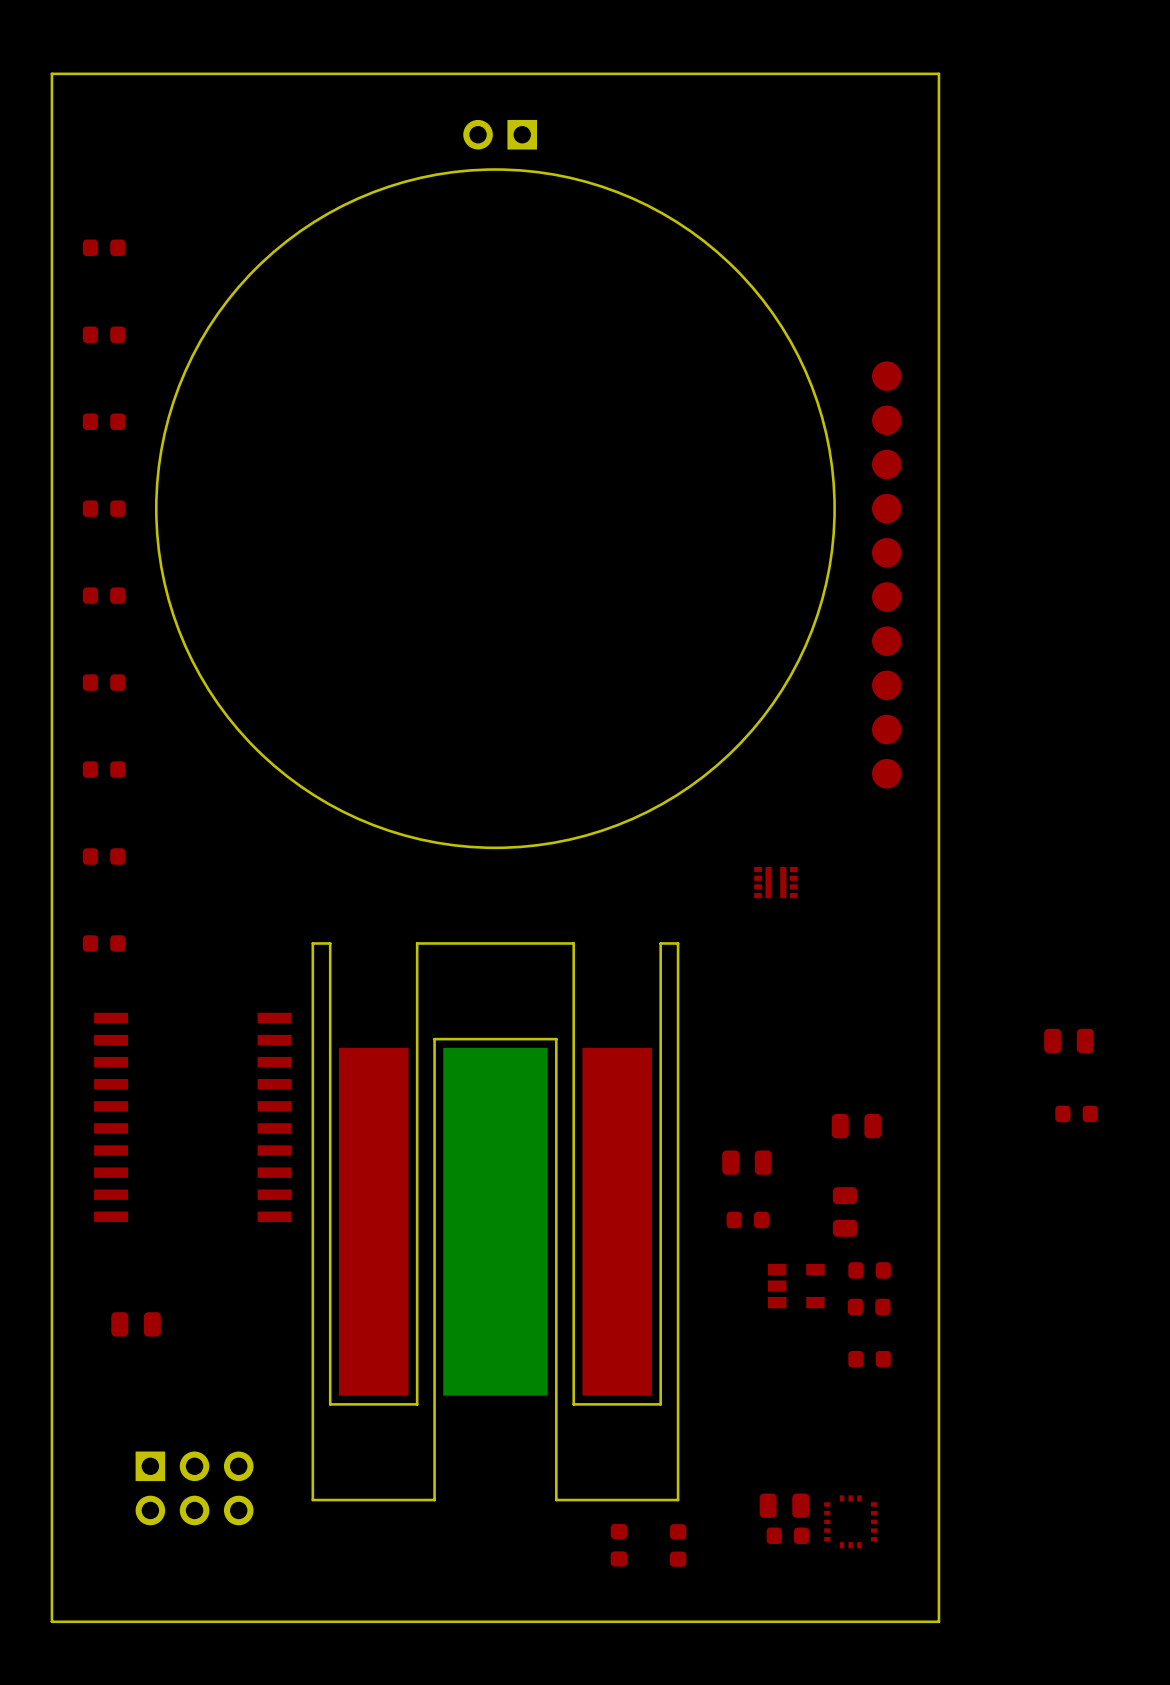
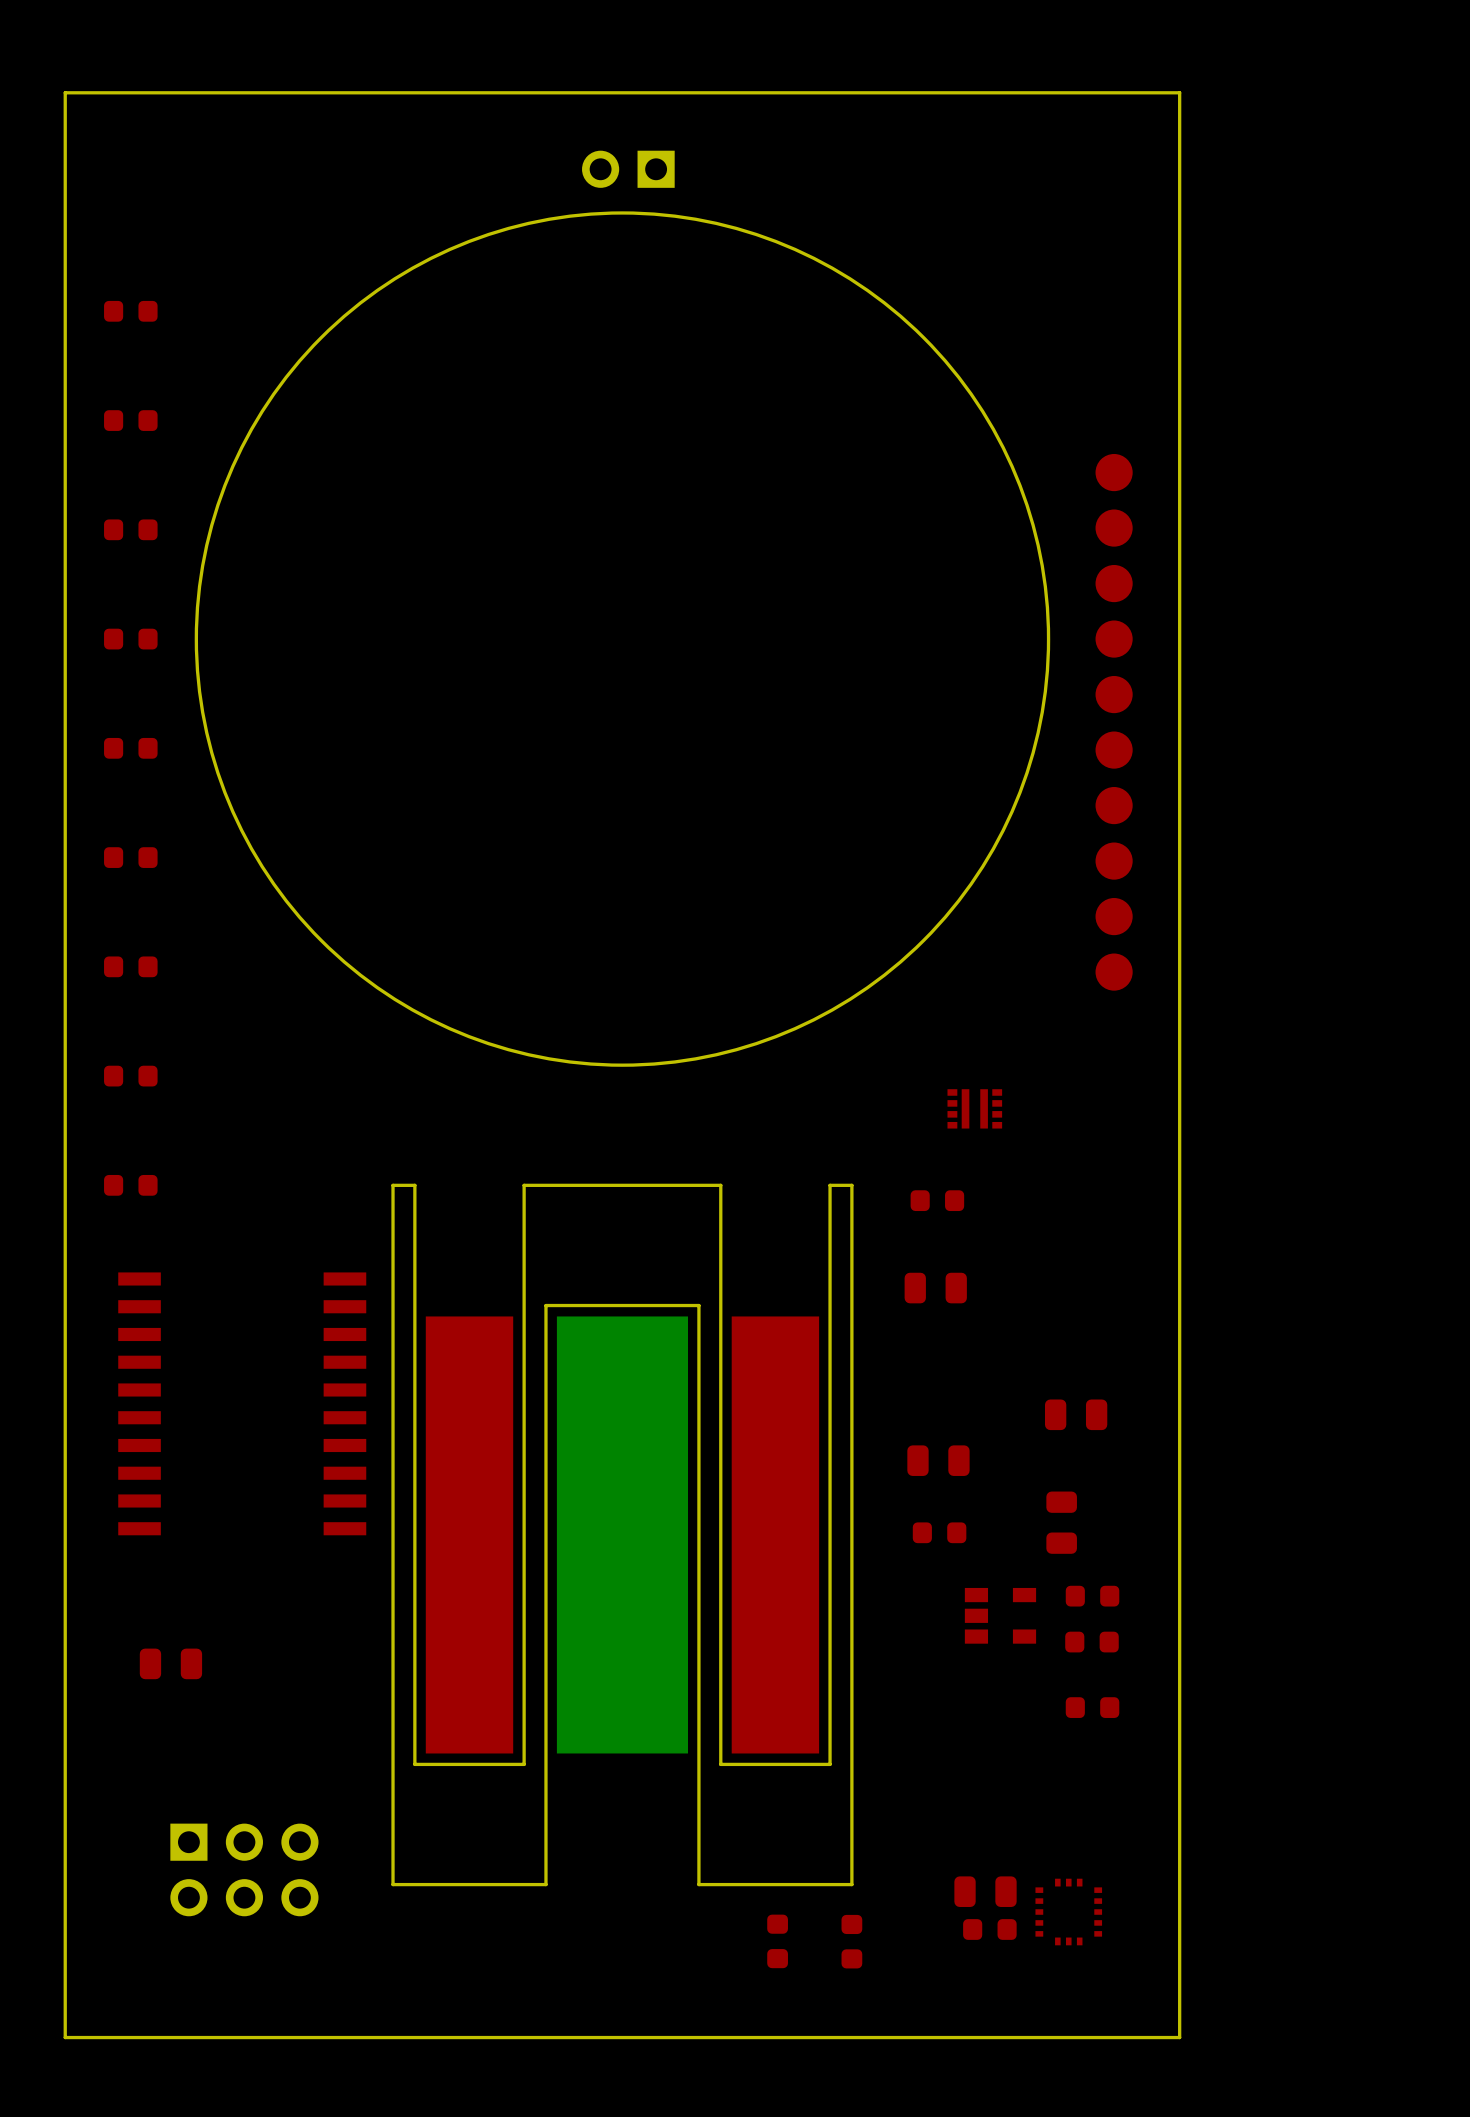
part position: (1068, 1040) -> (935, 1288)
part position: (1076, 1113) -> (937, 1200)

